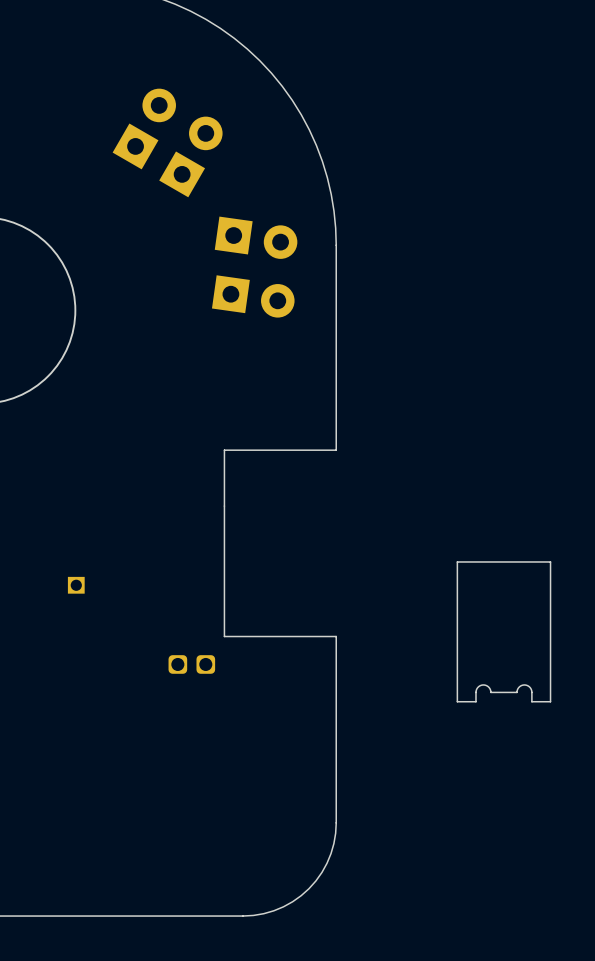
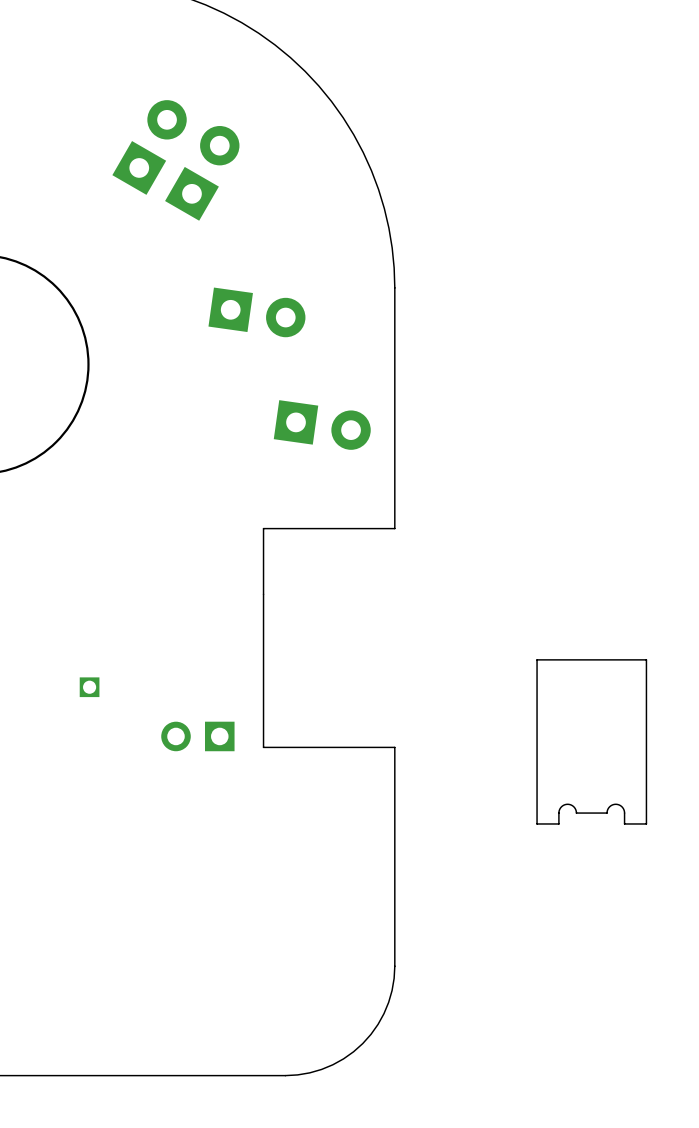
part: none -> (149, 147)
part: (144, 129) -> none
part: none -> (202, 173)
part: (190, 156) -> none
part: (256, 237) -> none
part: none -> (256, 312)
part: (253, 296) -> none
part: none -> (322, 424)
part: none -> (197, 736)
part: (177, 664) -> none
part: (205, 664) -> none

